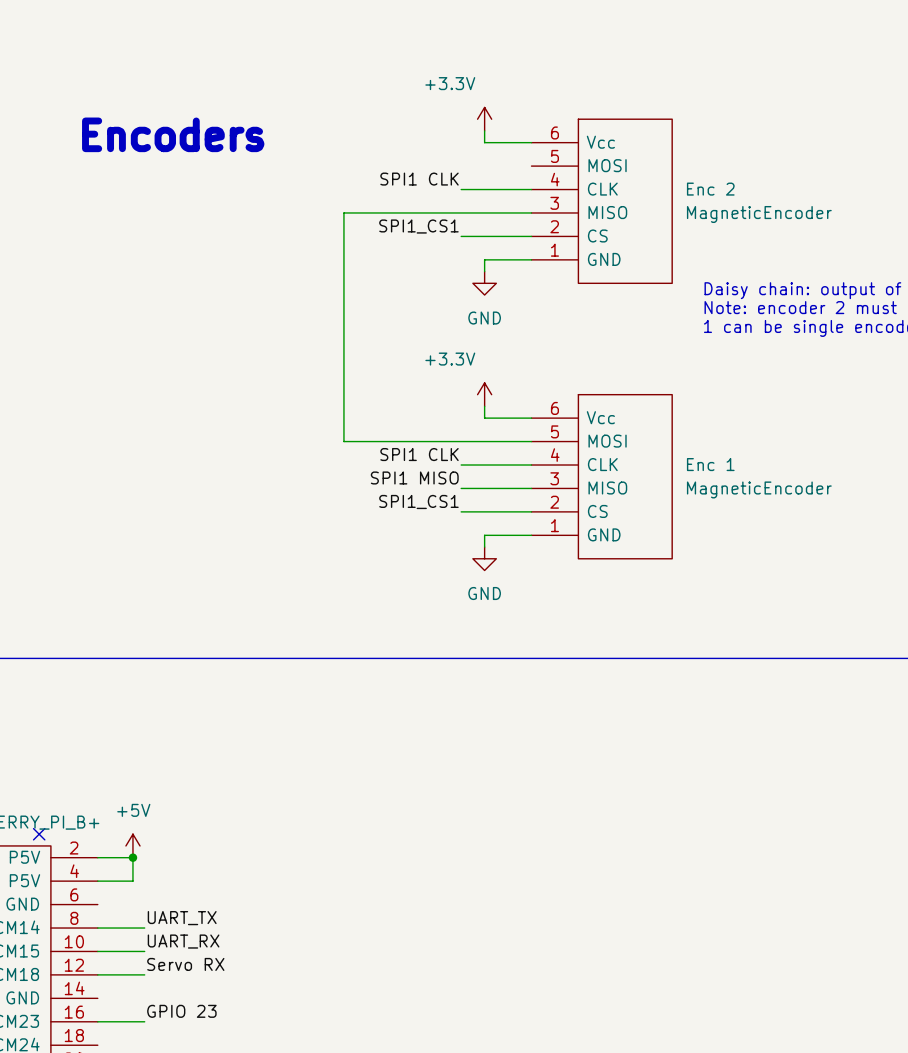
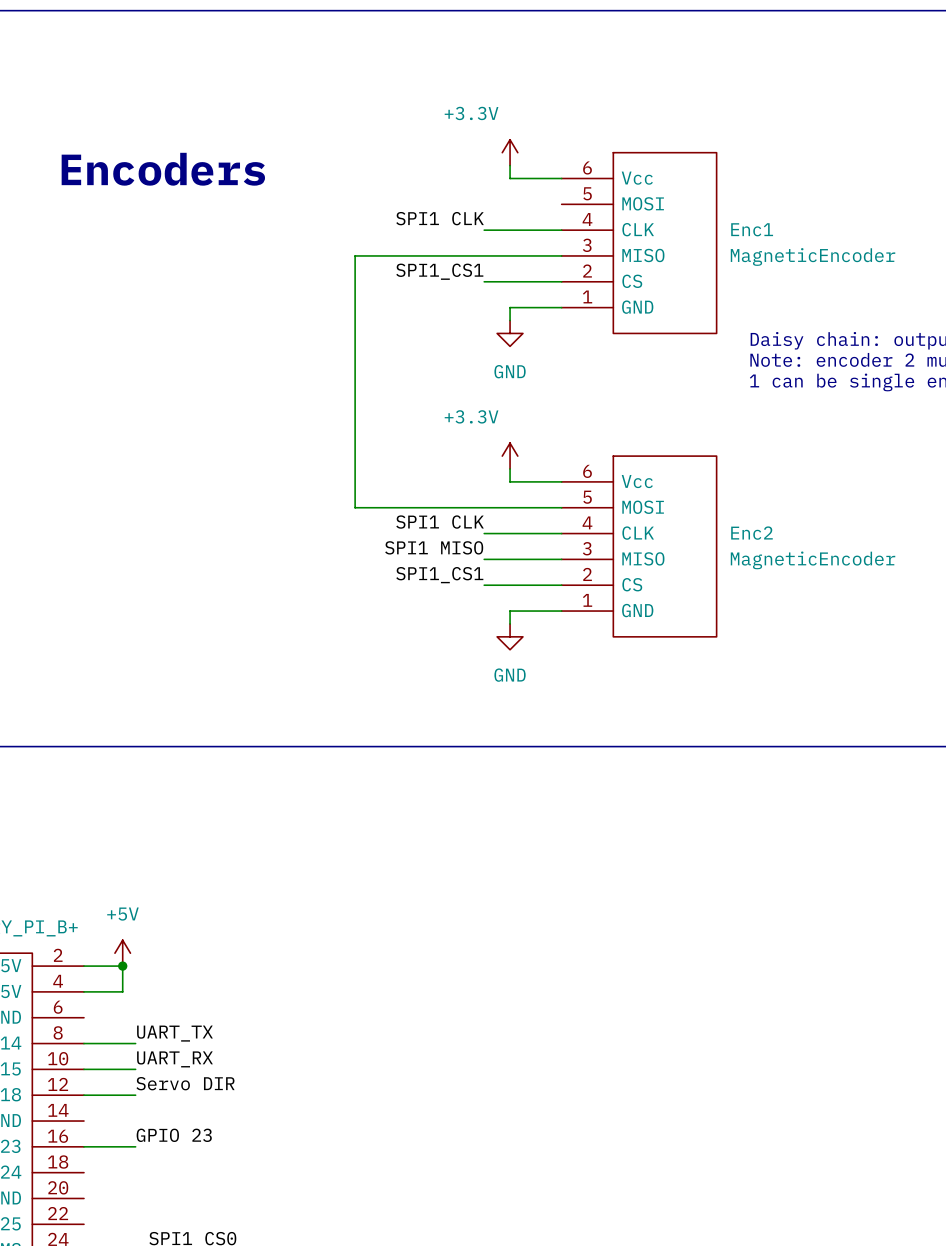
Enc 2 name: Enc 2 (710, 189) -> Enc1 (752, 229)
Enc 1 name: Enc 1 (710, 464) -> Enc2 (751, 533)
no-connect mark: (39, 834) -> none
label: Servo RX (185, 964) -> Servo DIR (185, 1083)

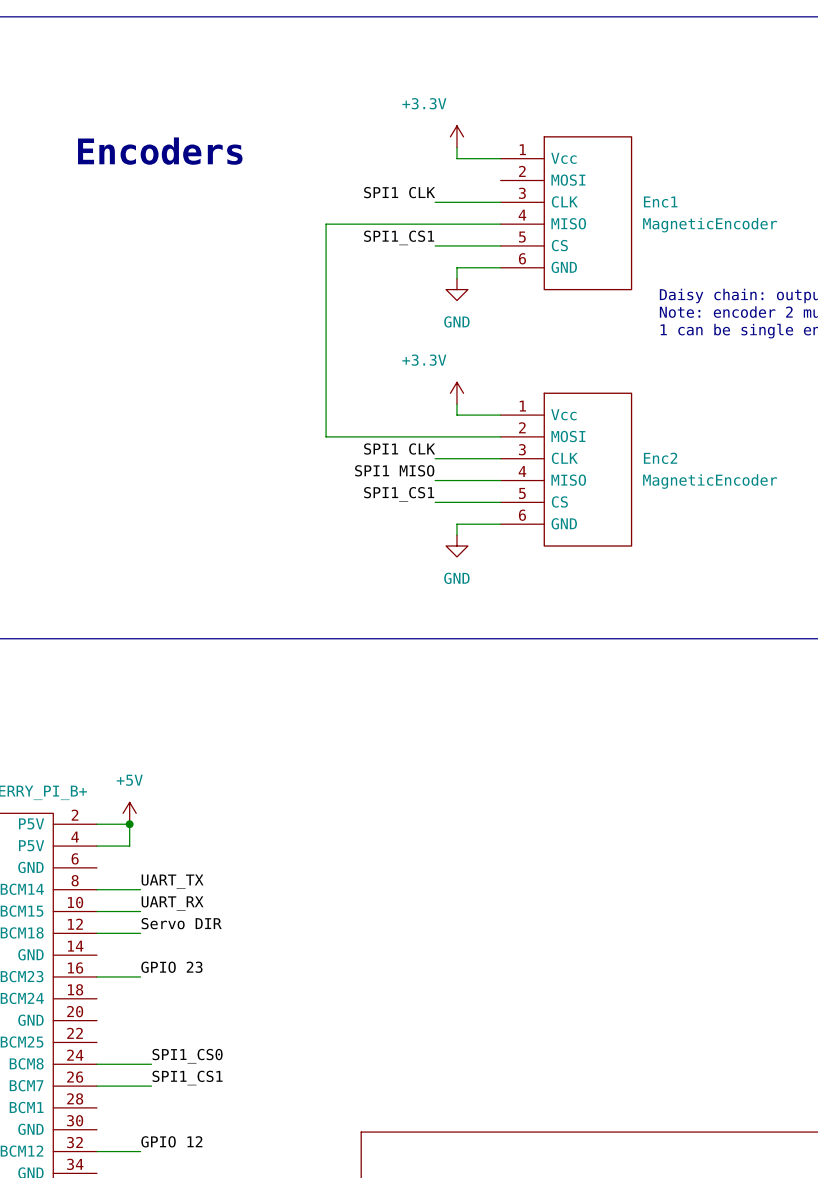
Enc1 pin number: 6 (587, 167) -> 1 (522, 149)
Enc1 pin number: 5 (587, 193) -> 2 (522, 171)
Enc1 pin number: 4 (587, 219) -> 3 (522, 193)
Enc1 pin number: 3 (587, 245) -> 4 (522, 215)
Enc1 pin number: 2 (587, 271) -> 5 (522, 237)
Enc1 pin number: 1 (587, 296) -> 6 (522, 258)
Enc2 pin number: 6 (587, 471) -> 1 (522, 406)
Enc2 pin number: 5 (587, 497) -> 2 (522, 427)
Enc2 pin number: 4 (587, 522) -> 3 (522, 449)
Enc2 pin number: 3 (587, 548) -> 4 (522, 471)
Enc2 pin number: 2 (587, 574) -> 5 (522, 493)
Enc2 pin number: 1 (587, 600) -> 6 (522, 515)

